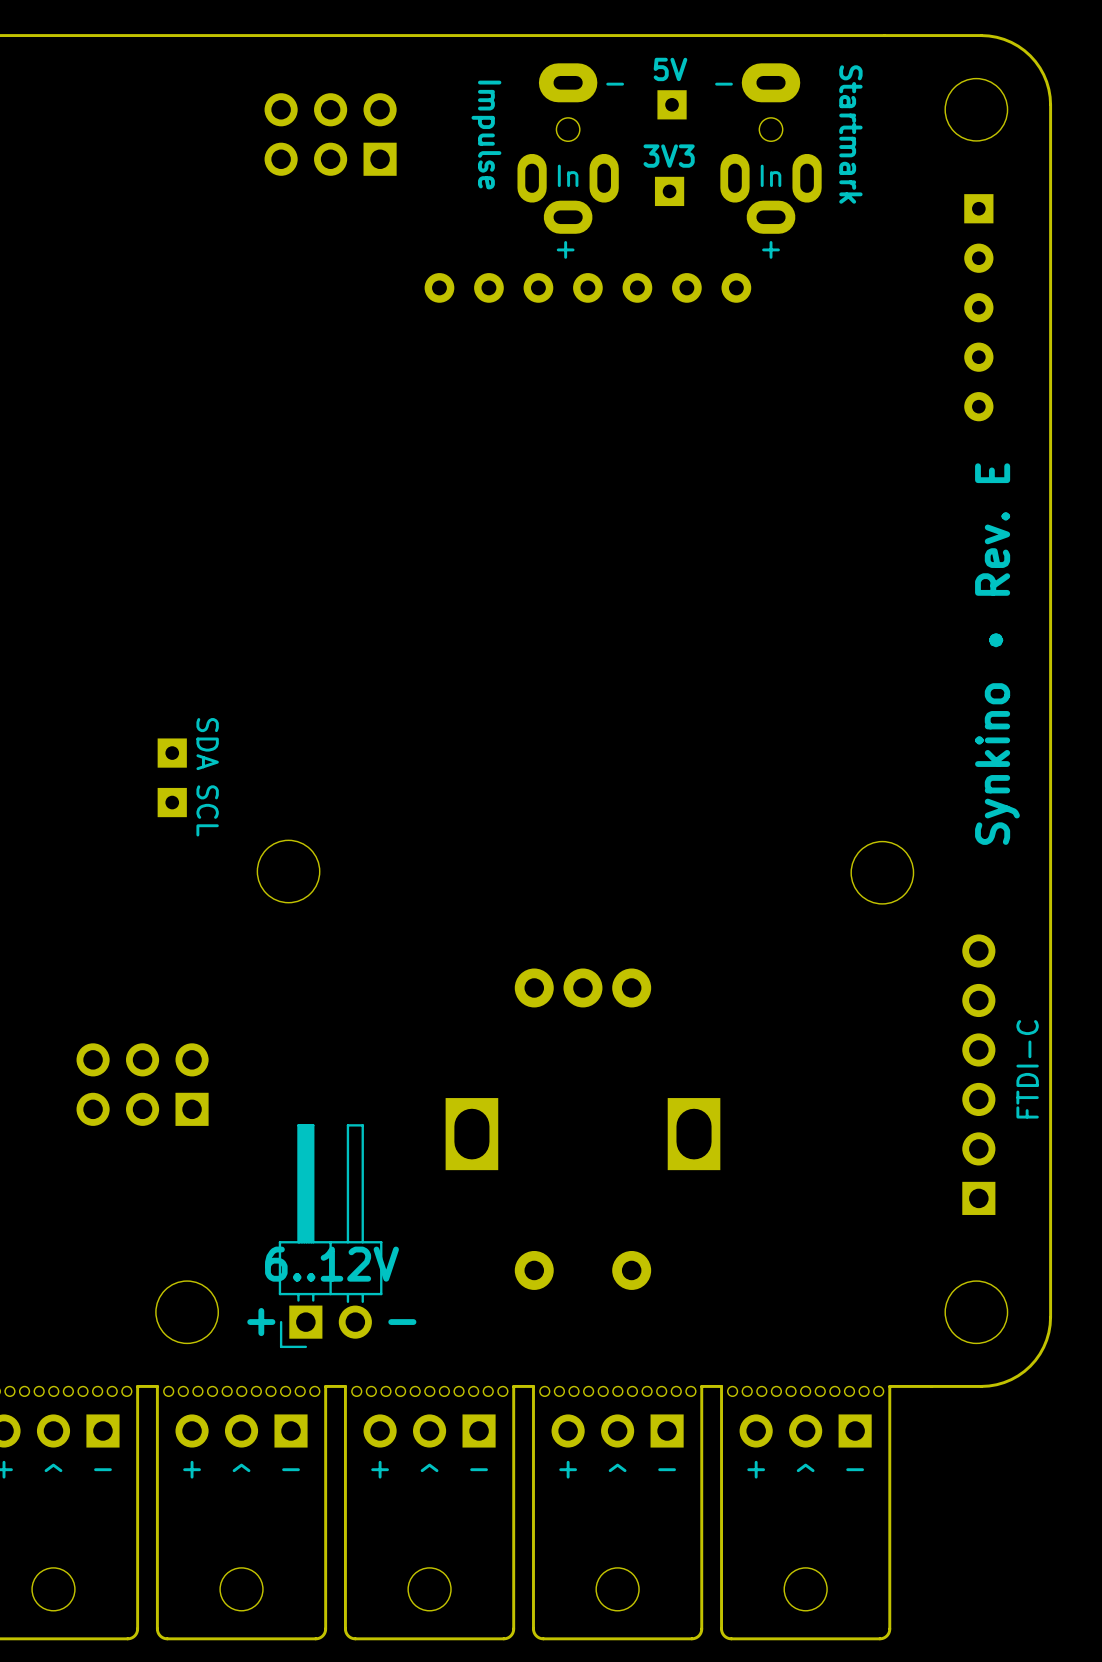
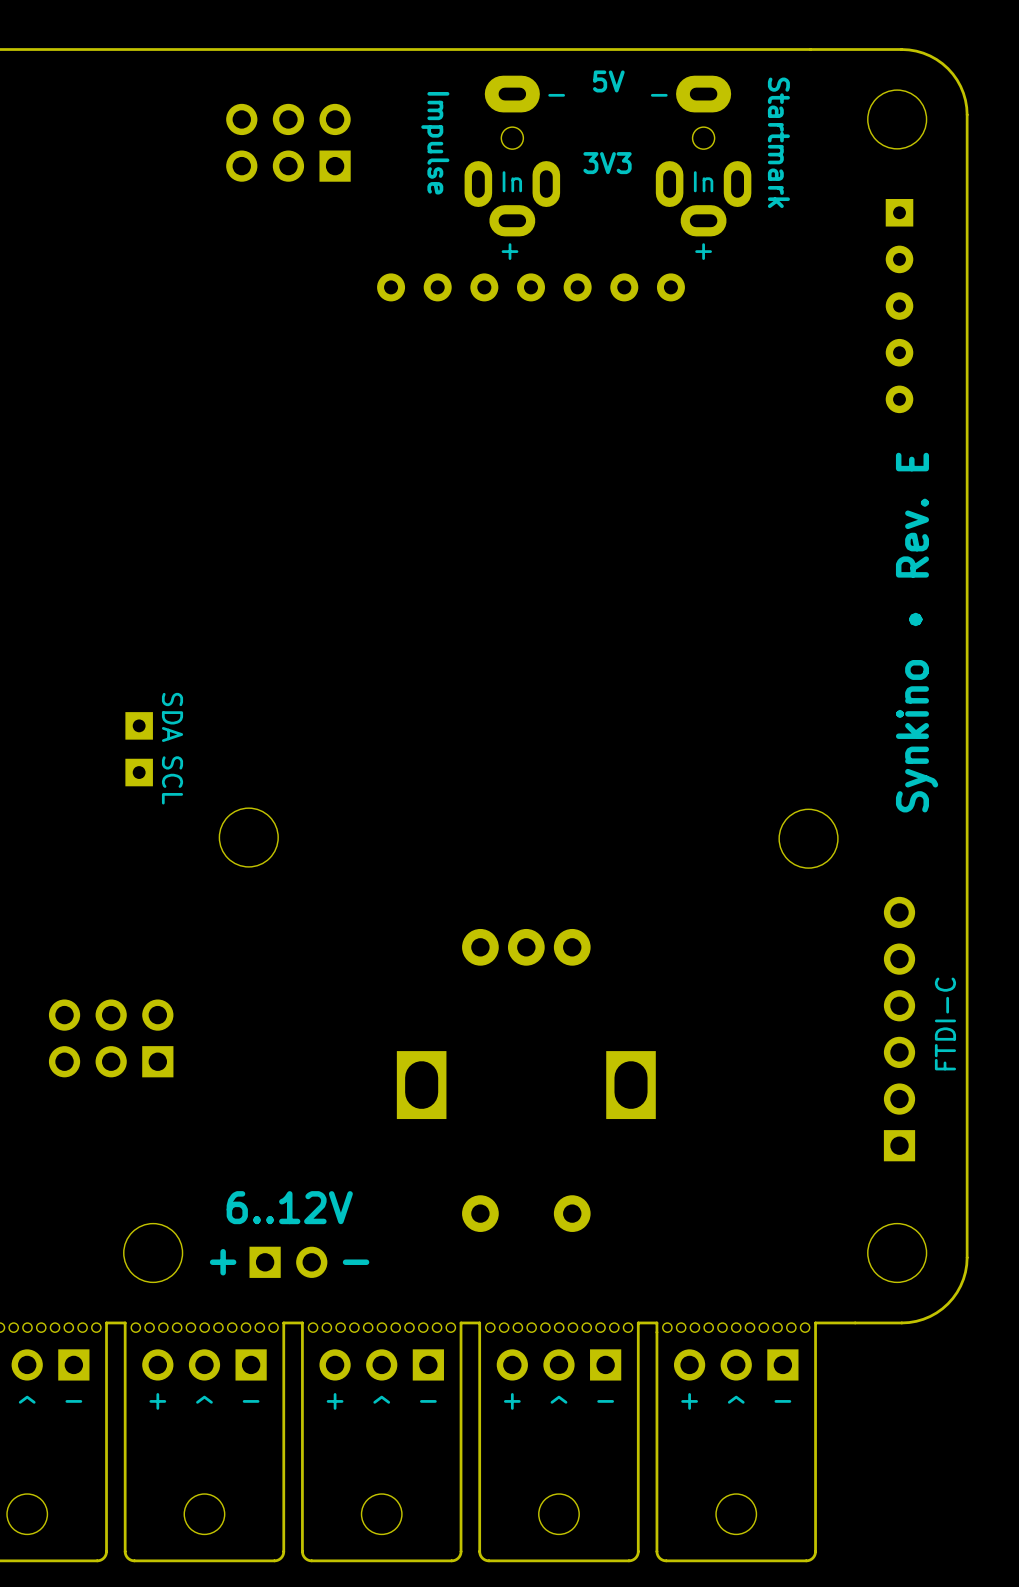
part: (672, 104) -> none
part: (669, 191) -> none
part side: bottom (330, 1236) -> top (288, 1262)

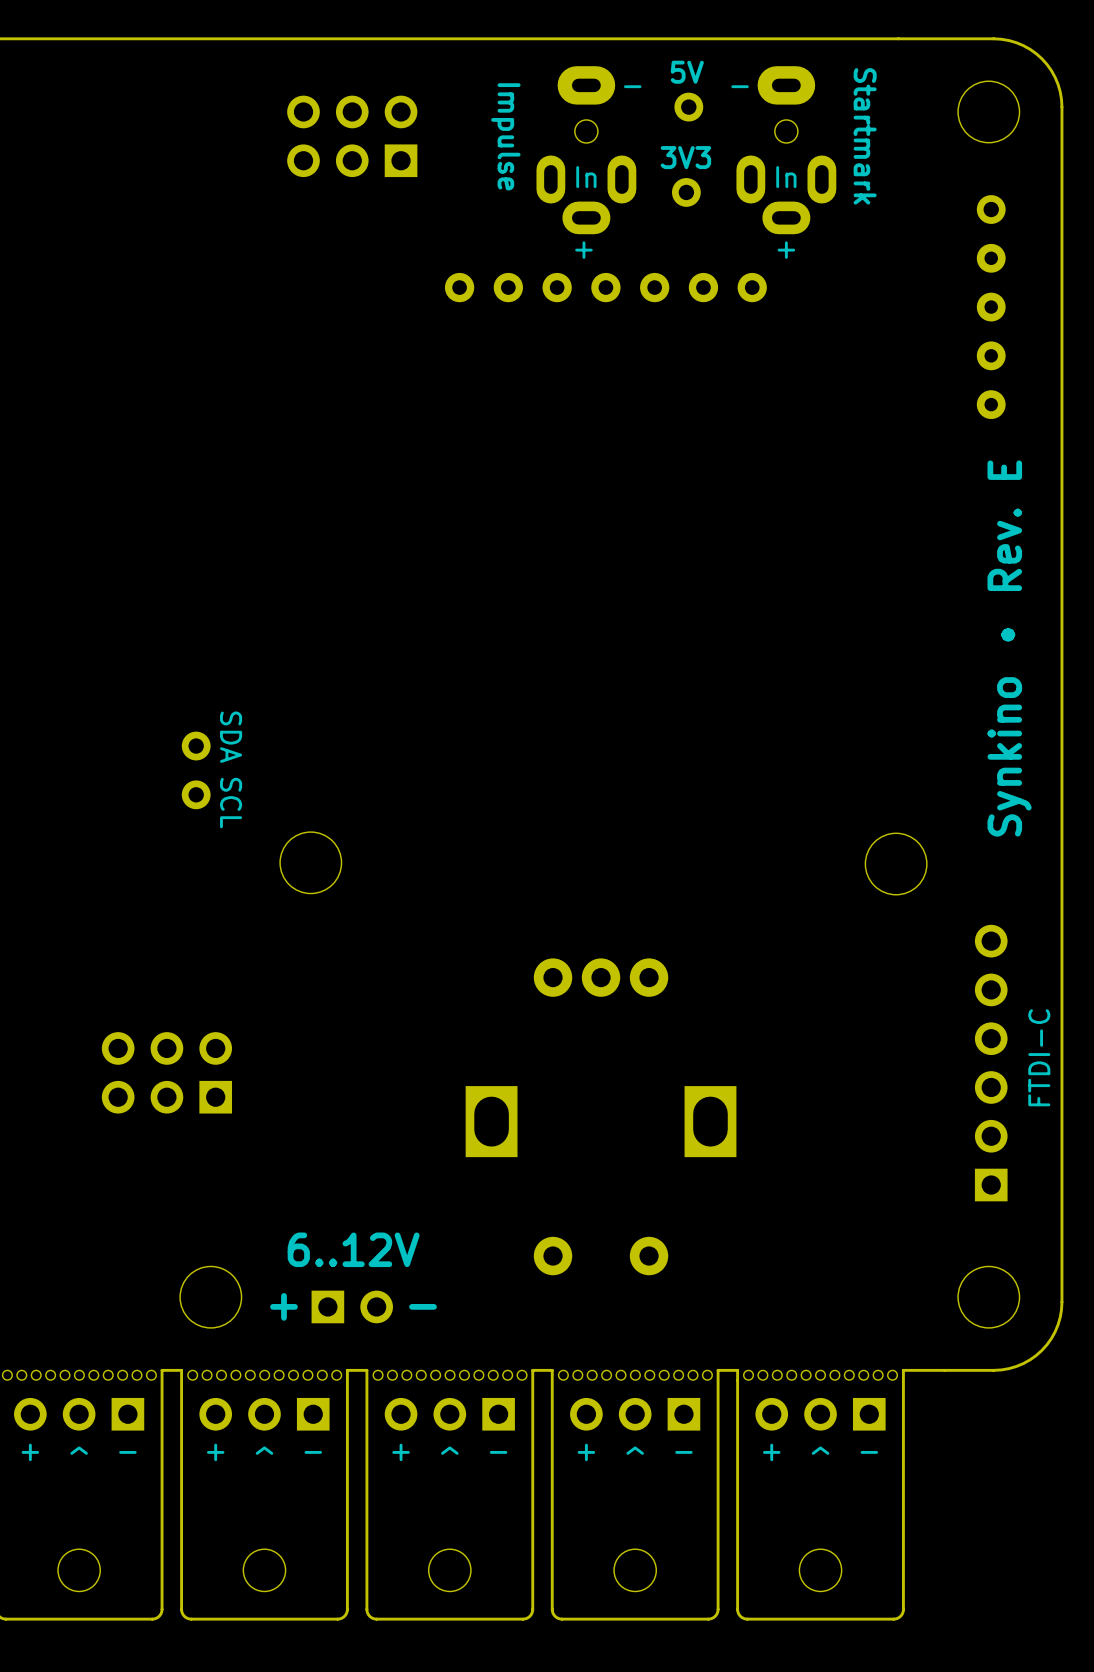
part: none -> (688, 107)
part: none -> (686, 192)
part footprint: [885, 198, 914, 227] -> [976, 195, 1006, 224]
part footprint: [125, 712, 153, 740] -> [181, 731, 211, 761]
part footprint: [125, 758, 153, 787] -> [181, 780, 211, 810]

